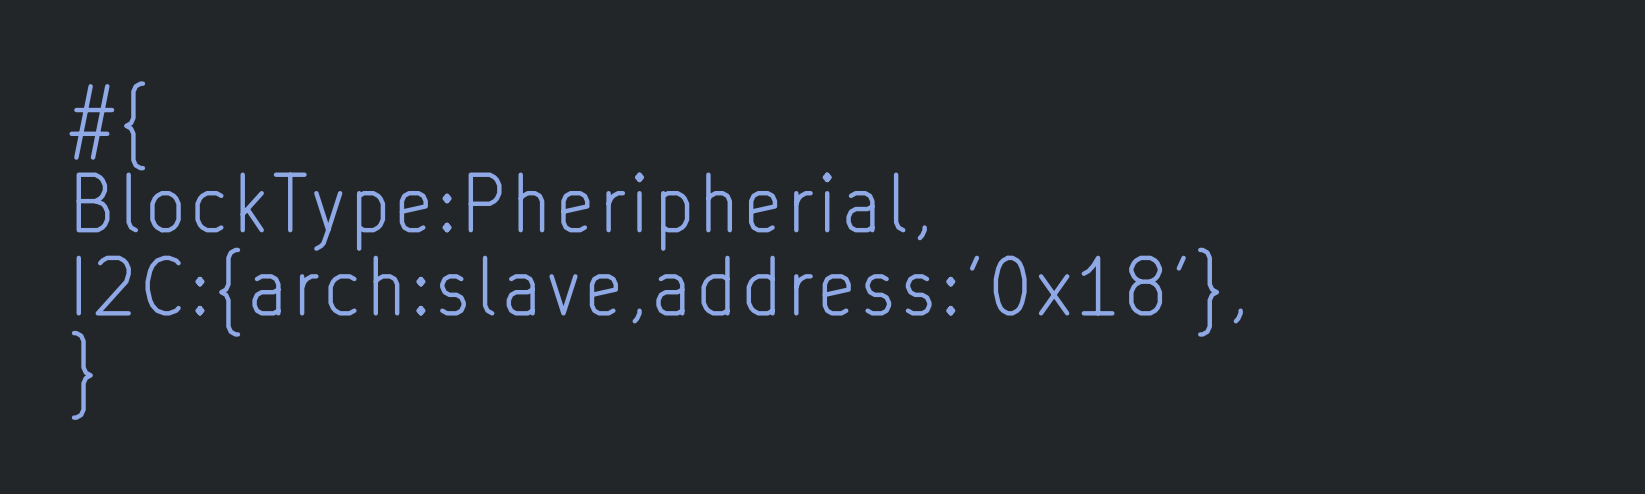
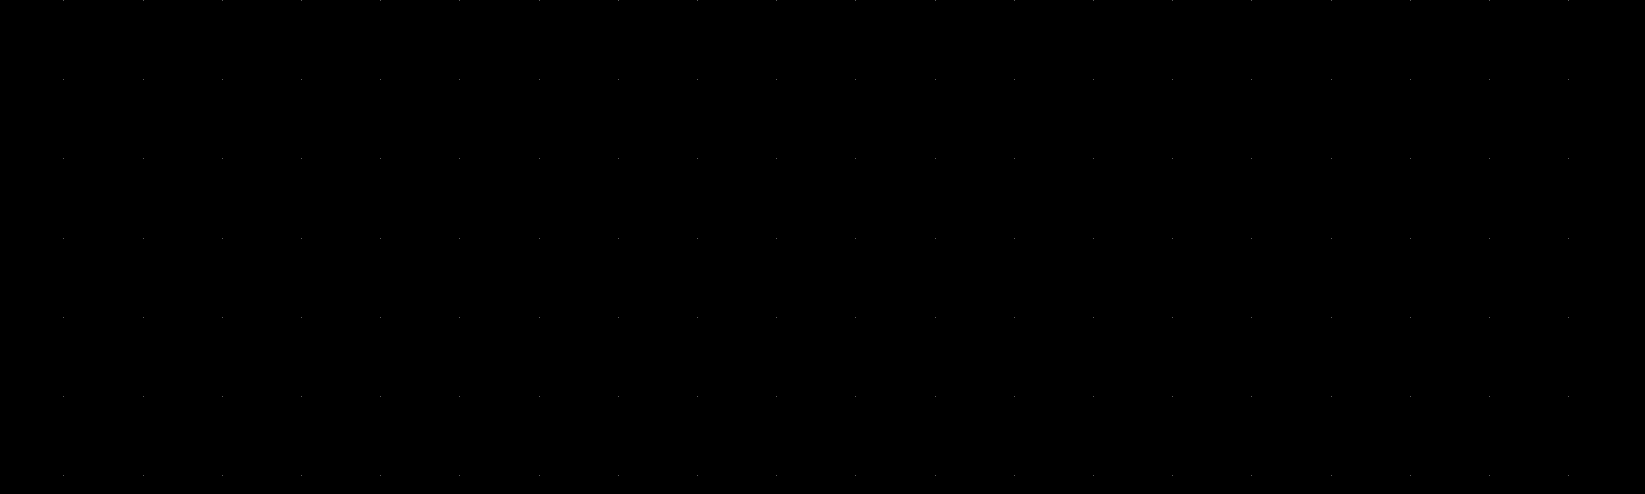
text: #{ (107, 125) -> none
text: BlockType:Pheripherial, (501, 211) -> none
text: I2C:{arch:slave,address:'0x18'}, (659, 292) -> none
text: } (82, 375) -> none

